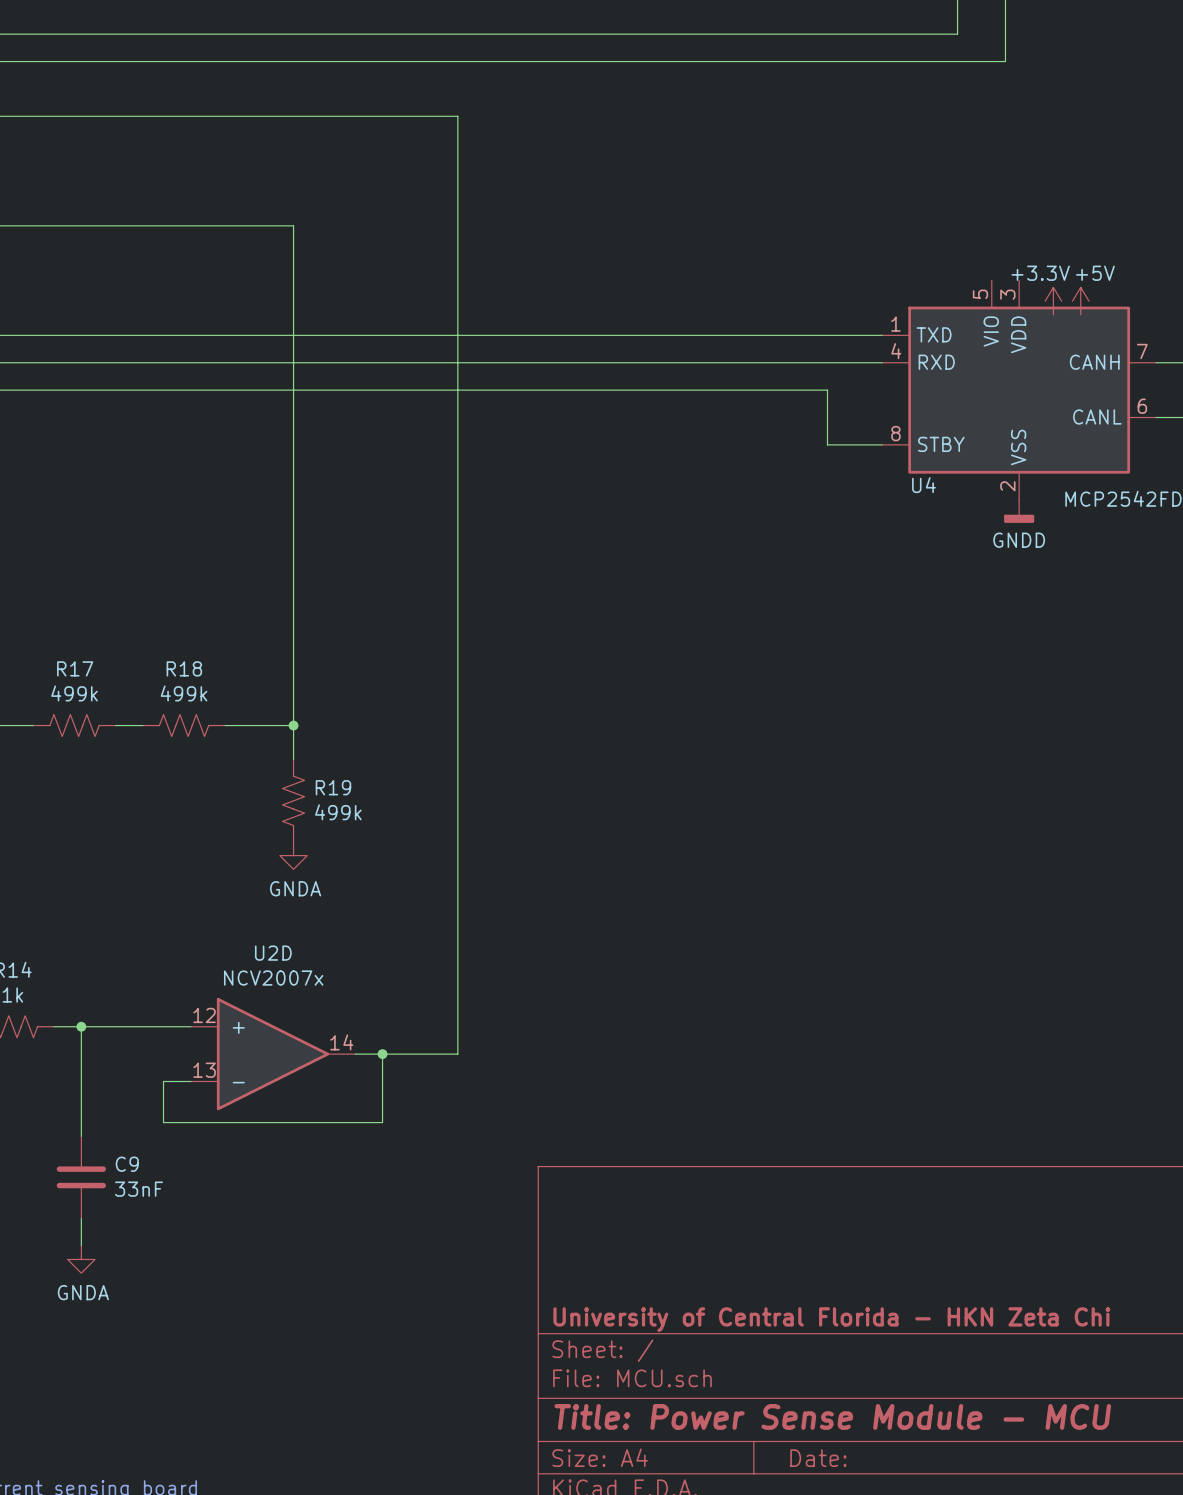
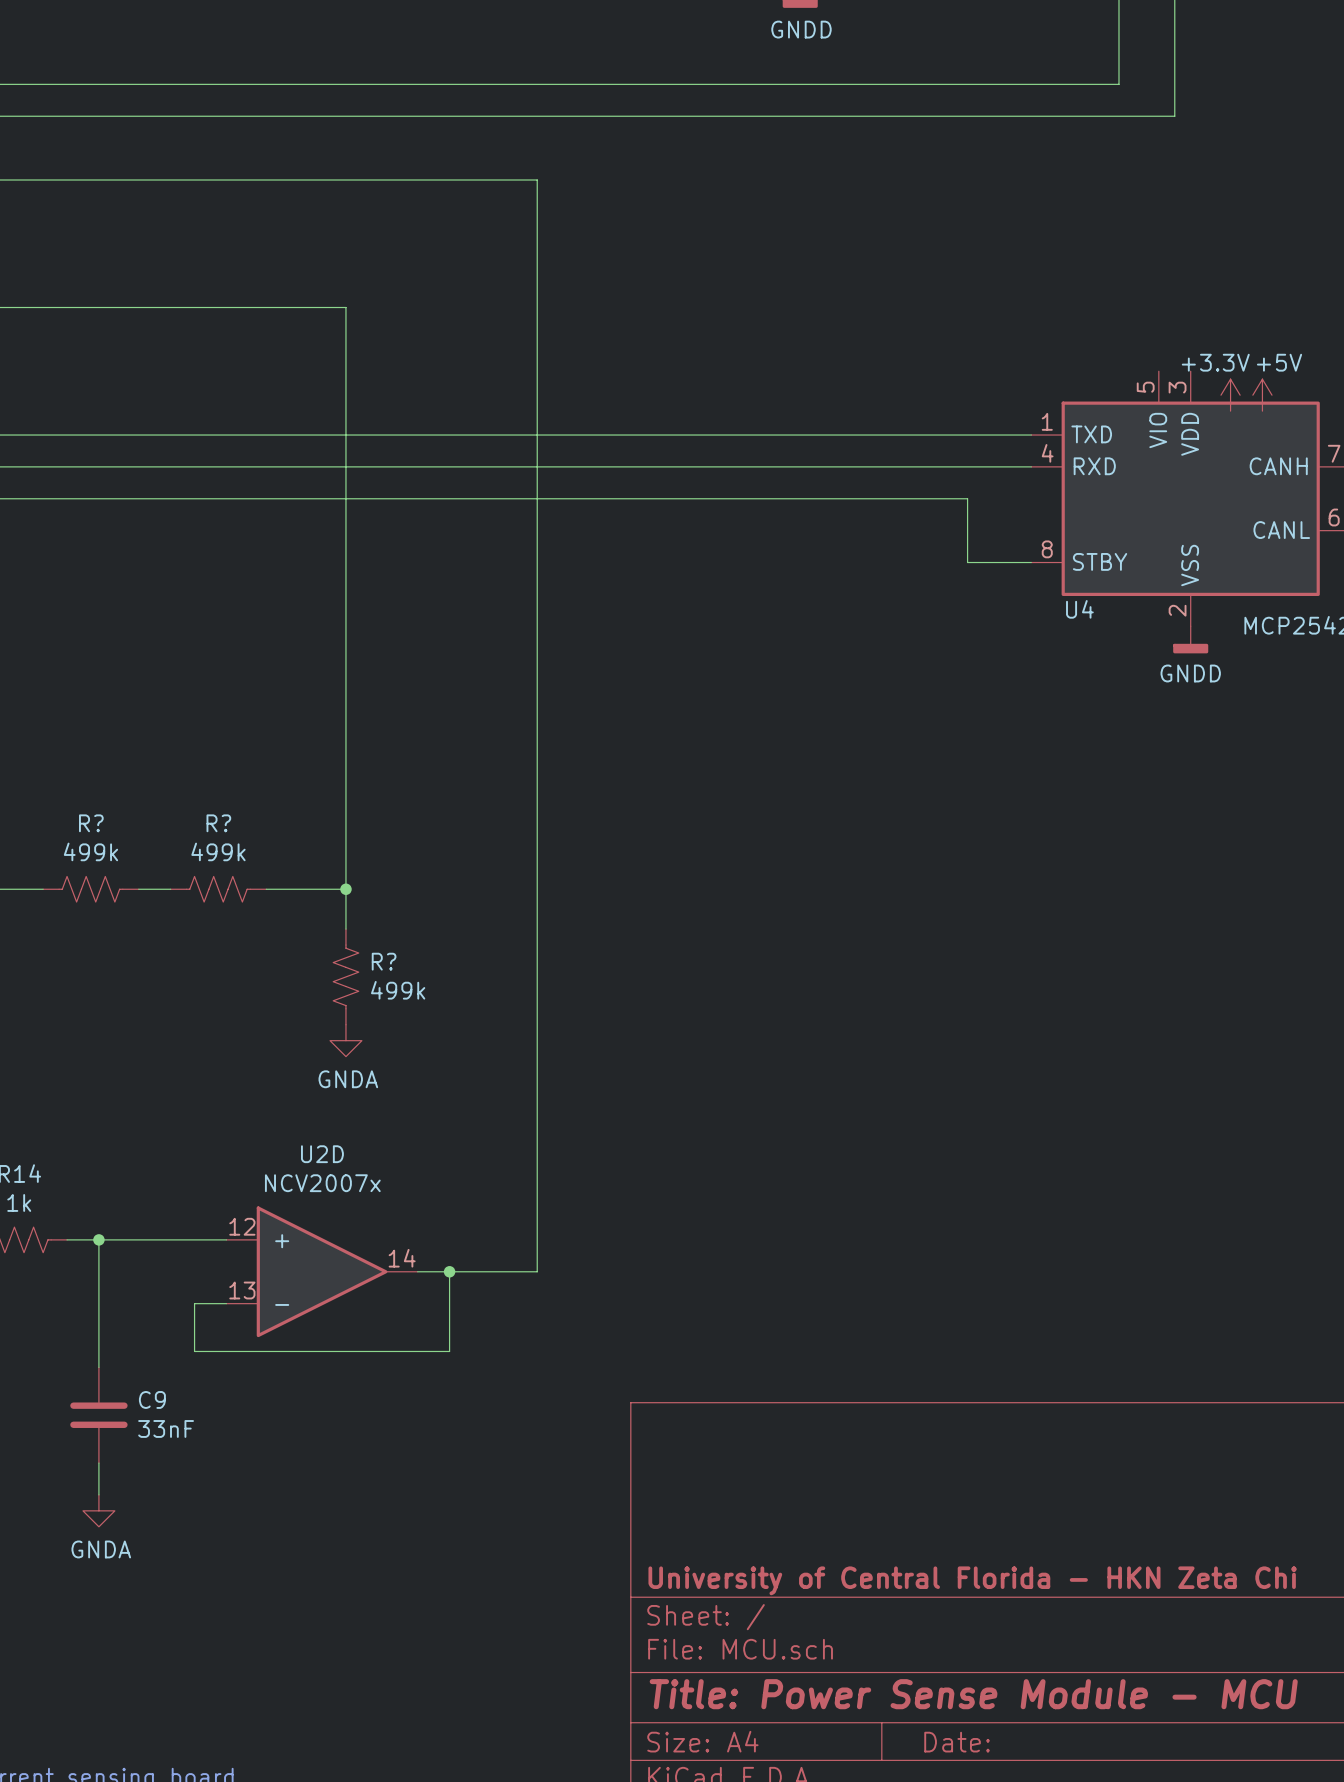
R17 name: R17 (75, 668) -> R? (91, 823)
R18 name: R18 (184, 668) -> R? (218, 823)
R19 name: R19 (333, 787) -> R? (384, 961)

